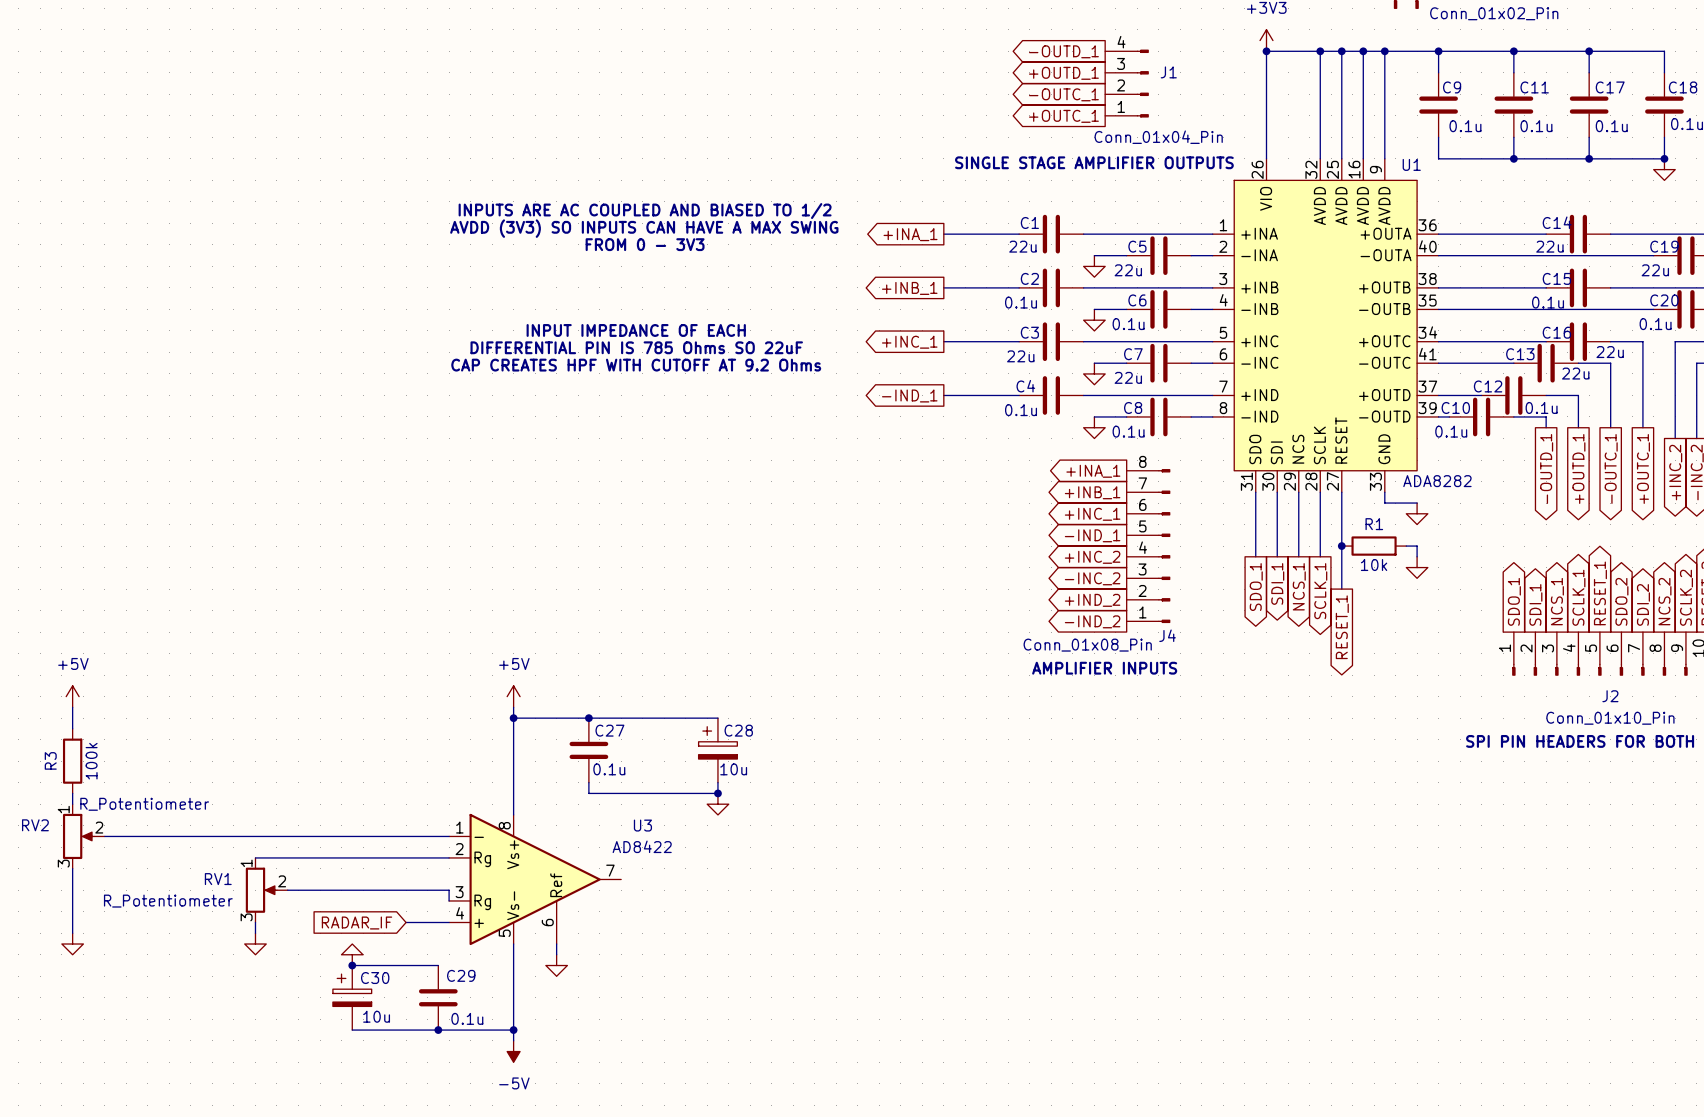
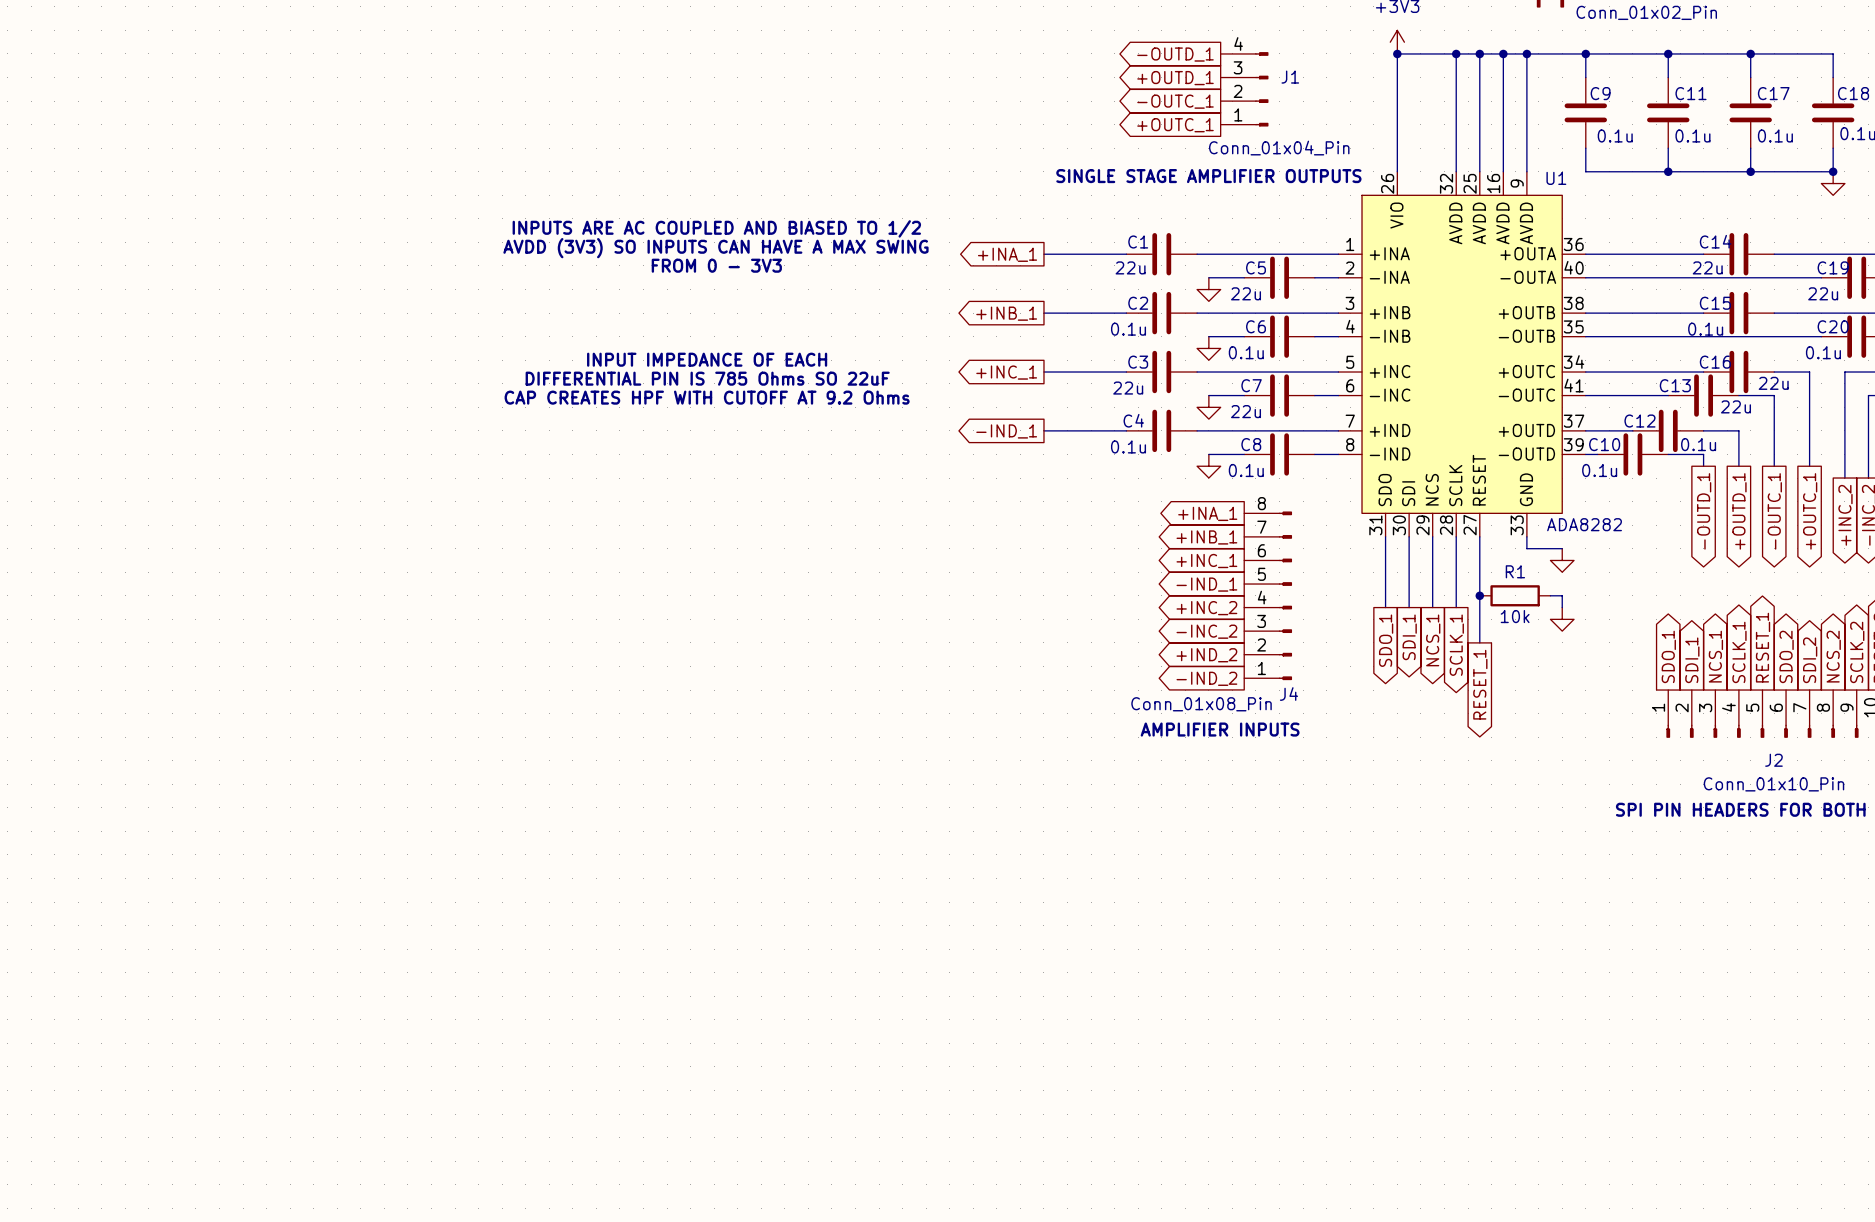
power symbol: +5V (72, 696) -> none
power symbol: +5V (513, 696) -> none
wire: (72, 707) (72, 728) -> none
wire: (513, 707) (513, 814) -> none
wire: (513, 718) (717, 718) -> none
junction: (513, 718) -> none
junction: (588, 718) -> none
C27: 0.1u (588, 750) -> none
C28: 10u (717, 750) -> none
R3: 100k (72, 761) -> none
wire: (588, 782) (588, 793) (717, 793) (717, 782) -> none
wire: (72, 793) (72, 804) -> none
junction: (717, 793) -> none
power symbol: (717, 804) -> none
RV2: R_Potentiometer (83, 836) -> none
wire: (104, 836) (449, 836) -> none
wire: (255, 857) (449, 857) -> none
wire: (72, 868) (72, 933) -> none
U3: AD8422 (535, 879) -> none
RV1: R_Potentiometer (266, 890) -> none
wire: (287, 890) (449, 890) (449, 900) -> none
wire: (255, 922) (255, 933) -> none
wire: (406, 922) (449, 922) -> none
global label: RADAR_IF (357, 923) -> none
power symbol: (72, 944) -> none
power symbol: (255, 944) -> none
wire: (513, 944) (513, 1040) -> none
wire: (556, 944) (556, 954) -> none
power symbol: (352, 954) -> none
wire: (352, 965) (438, 965) -> none
junction: (352, 965) -> none
power symbol: (556, 965) -> none
C30: 10u (352, 997) -> none
C29: 0.1u (438, 997) -> none
wire: (352, 1030) (513, 1030) -> none
junction: (438, 1030) -> none
junction: (513, 1030) -> none
power symbol: -5V (513, 1051) -> none

